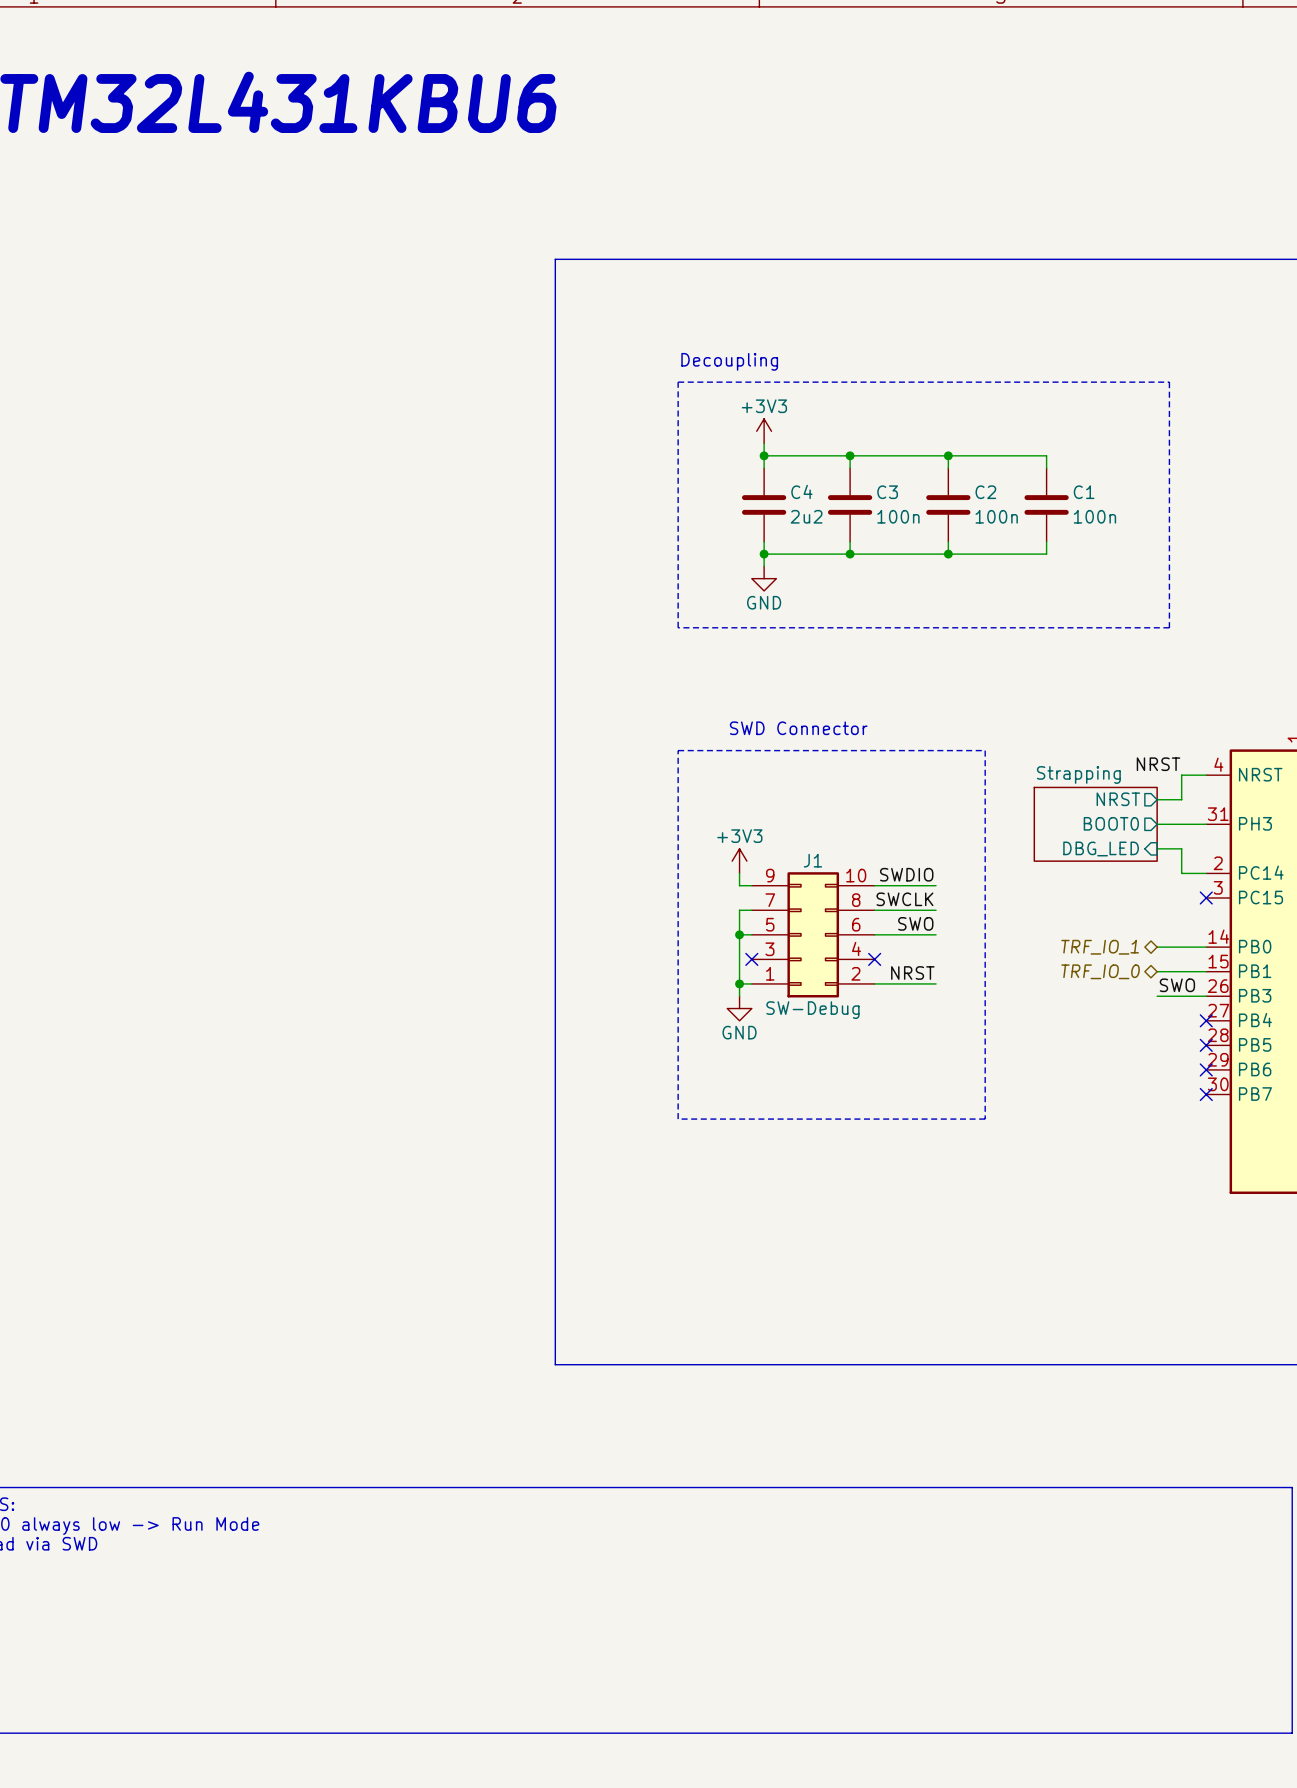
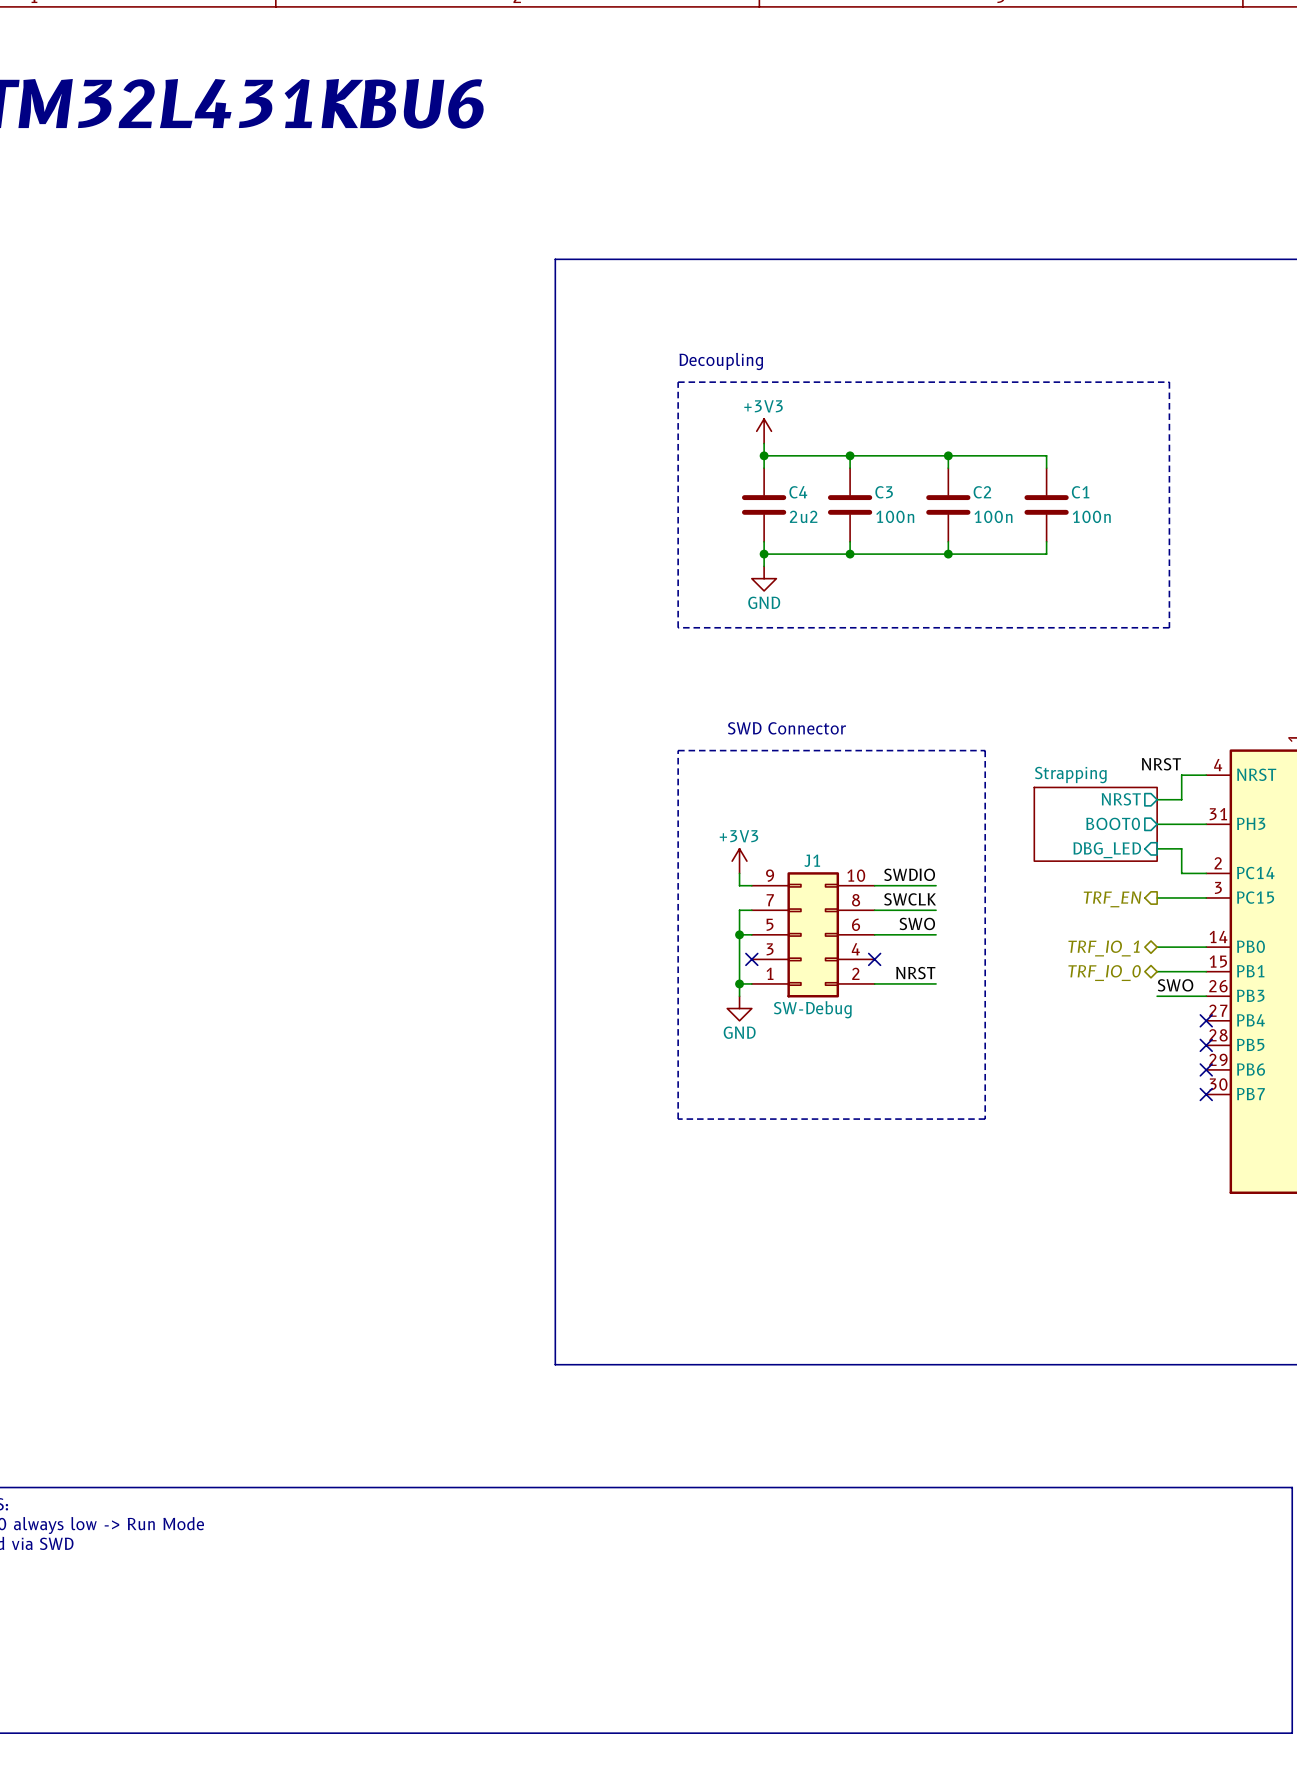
wire: none -> (1157, 897) (1206, 897)
no-connect mark: (1206, 897) -> none
hierarchical label: none -> TRF_EN (1112, 899)

